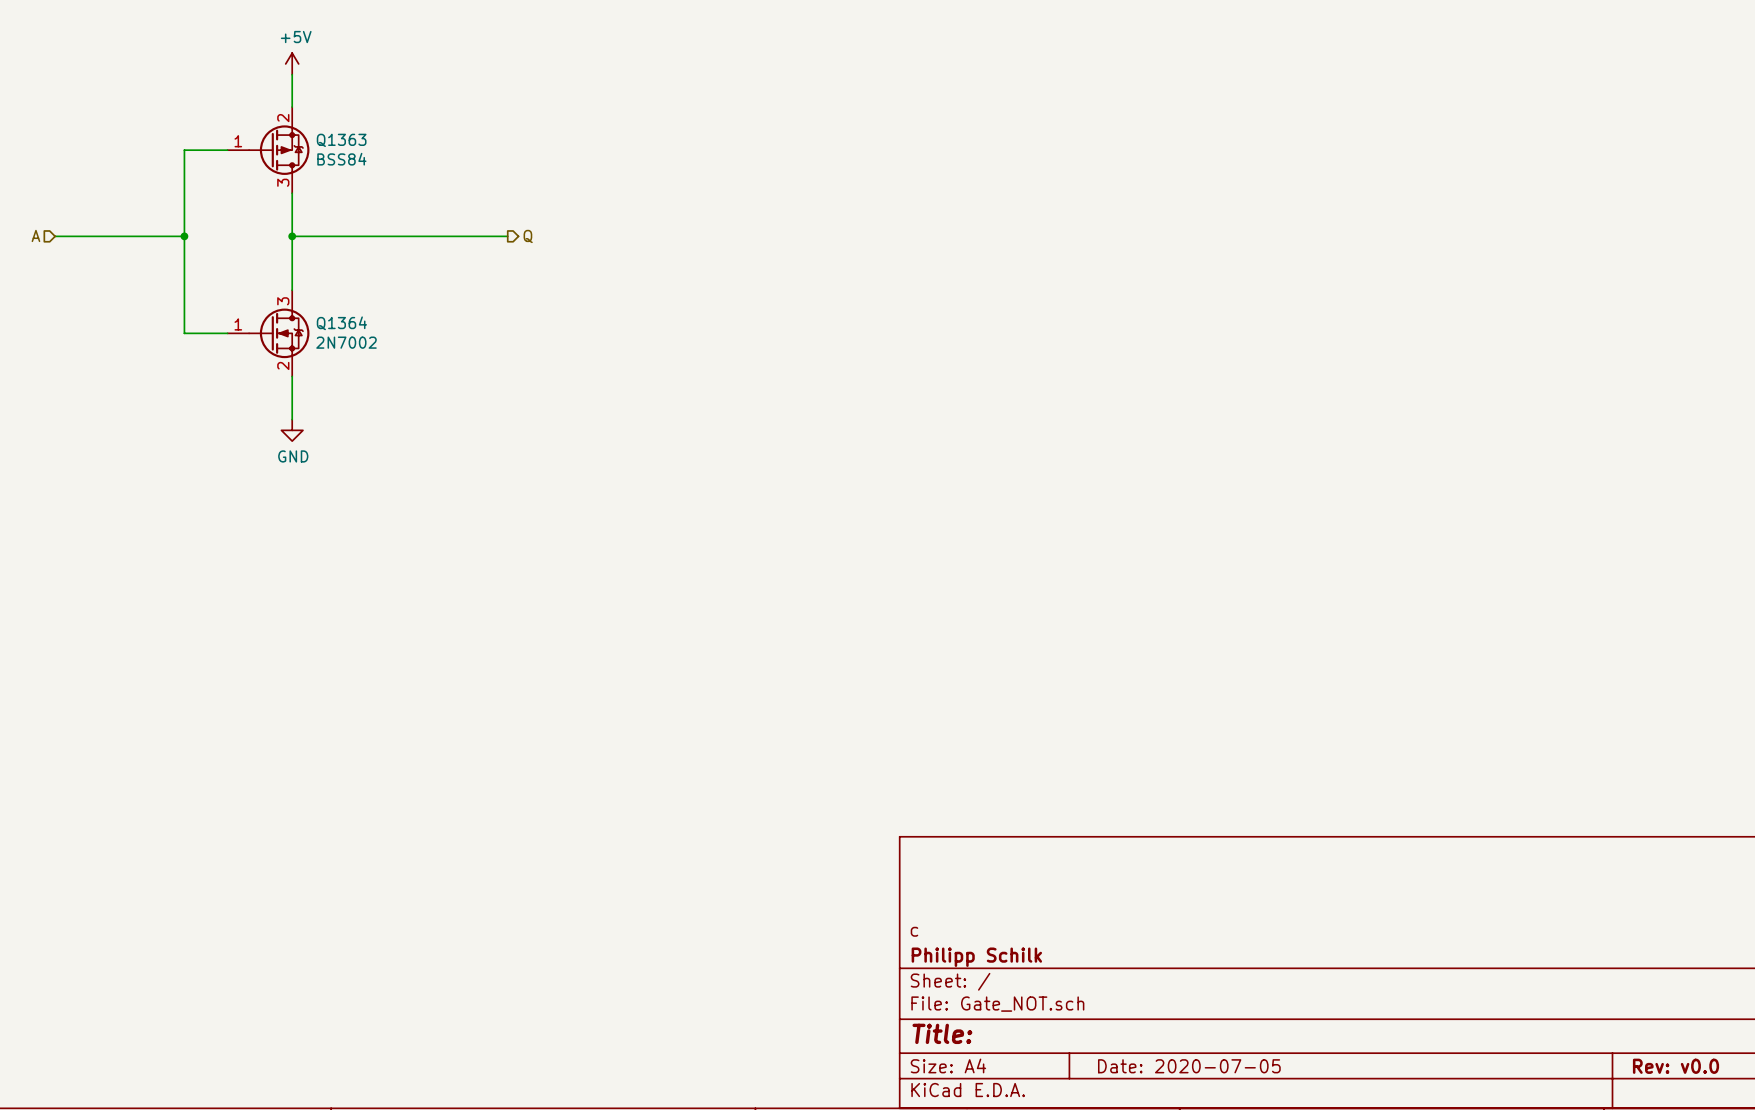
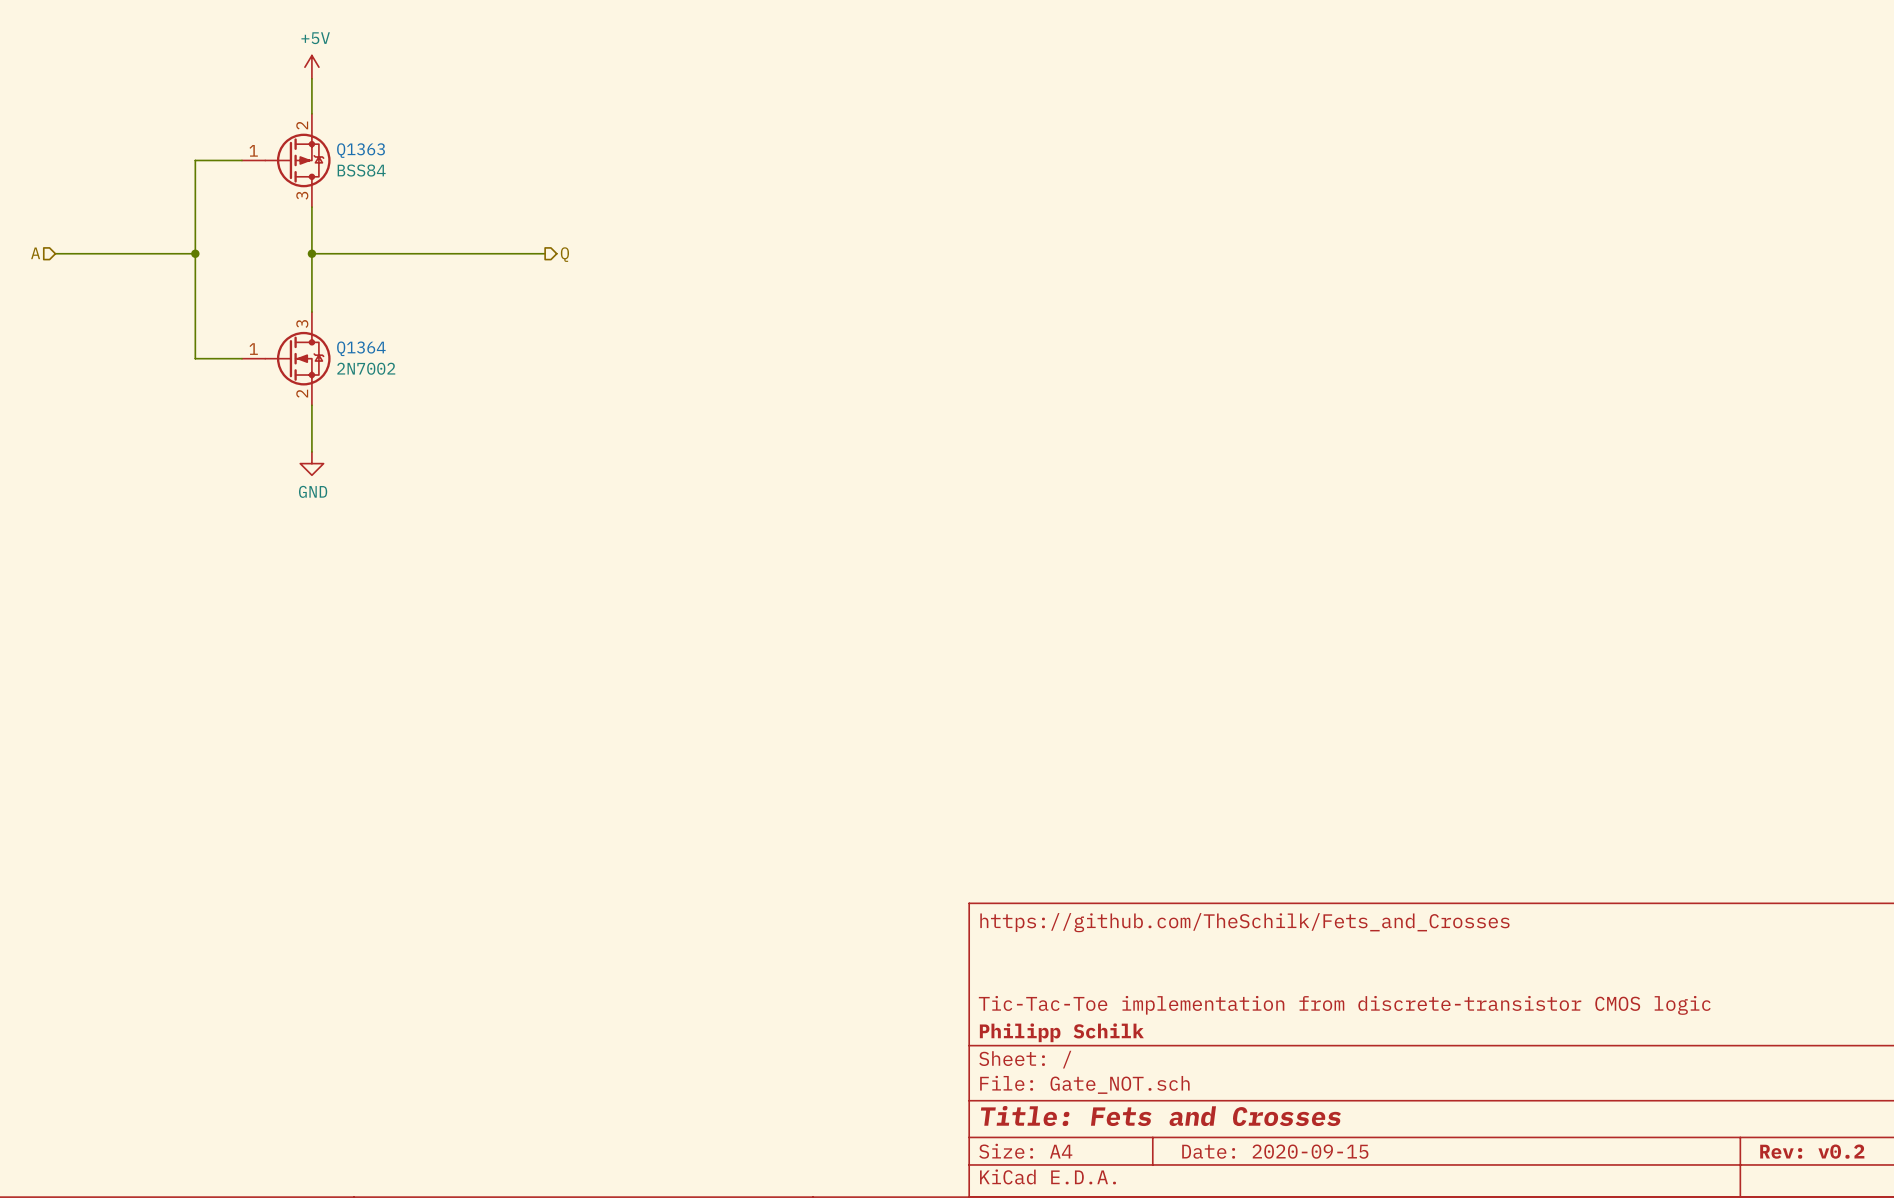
title block: none -> https://github.com/TheSchilk/Fets_and_Crosses (1244, 922)
title block: c (914, 931) -> Tic-Tac-Toe implementation from discrete-transistor CMOS logic (1344, 1005)
title block: Title: (942, 1033) -> Title: Fets and Crosses (1160, 1116)
title block: Date: 2020-07-05 (1189, 1066) -> Date: 2020-09-15 (1275, 1151)
title block: Rev: v0.0 (1676, 1066) -> Rev: v0.2 (1812, 1151)

